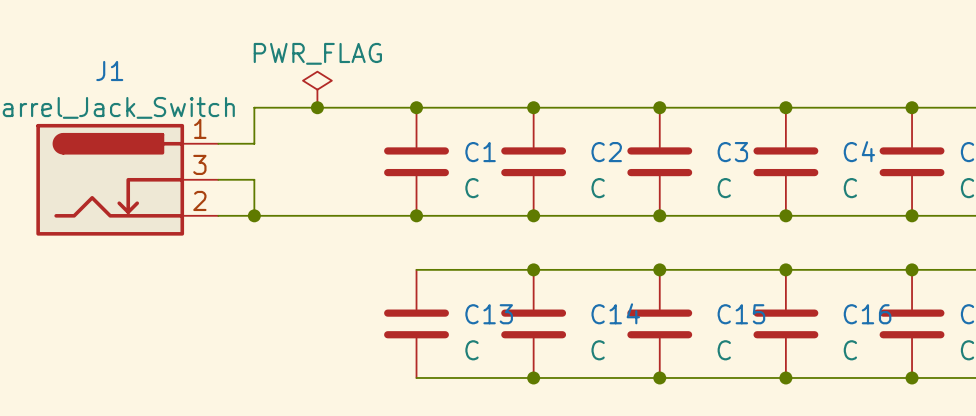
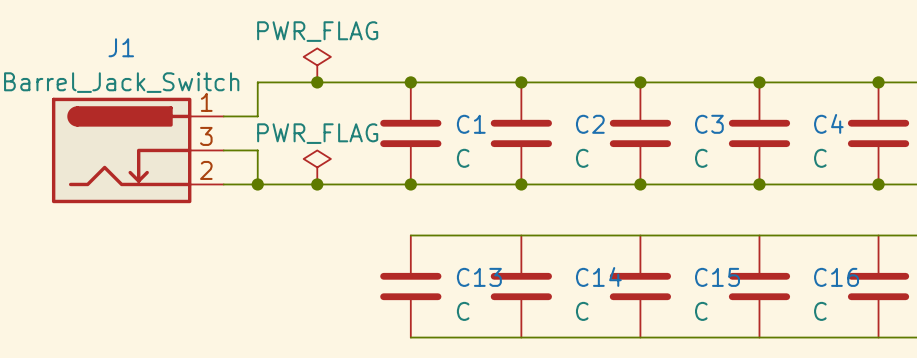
power symbol: none -> PWR_FLAG (317, 167)
junction: none -> (317, 184)
junction: (533, 269) -> none
junction: (659, 269) -> none
junction: (785, 269) -> none
junction: (912, 269) -> none
junction: (533, 377) -> none
junction: (659, 377) -> none
junction: (785, 377) -> none
junction: (912, 377) -> none

